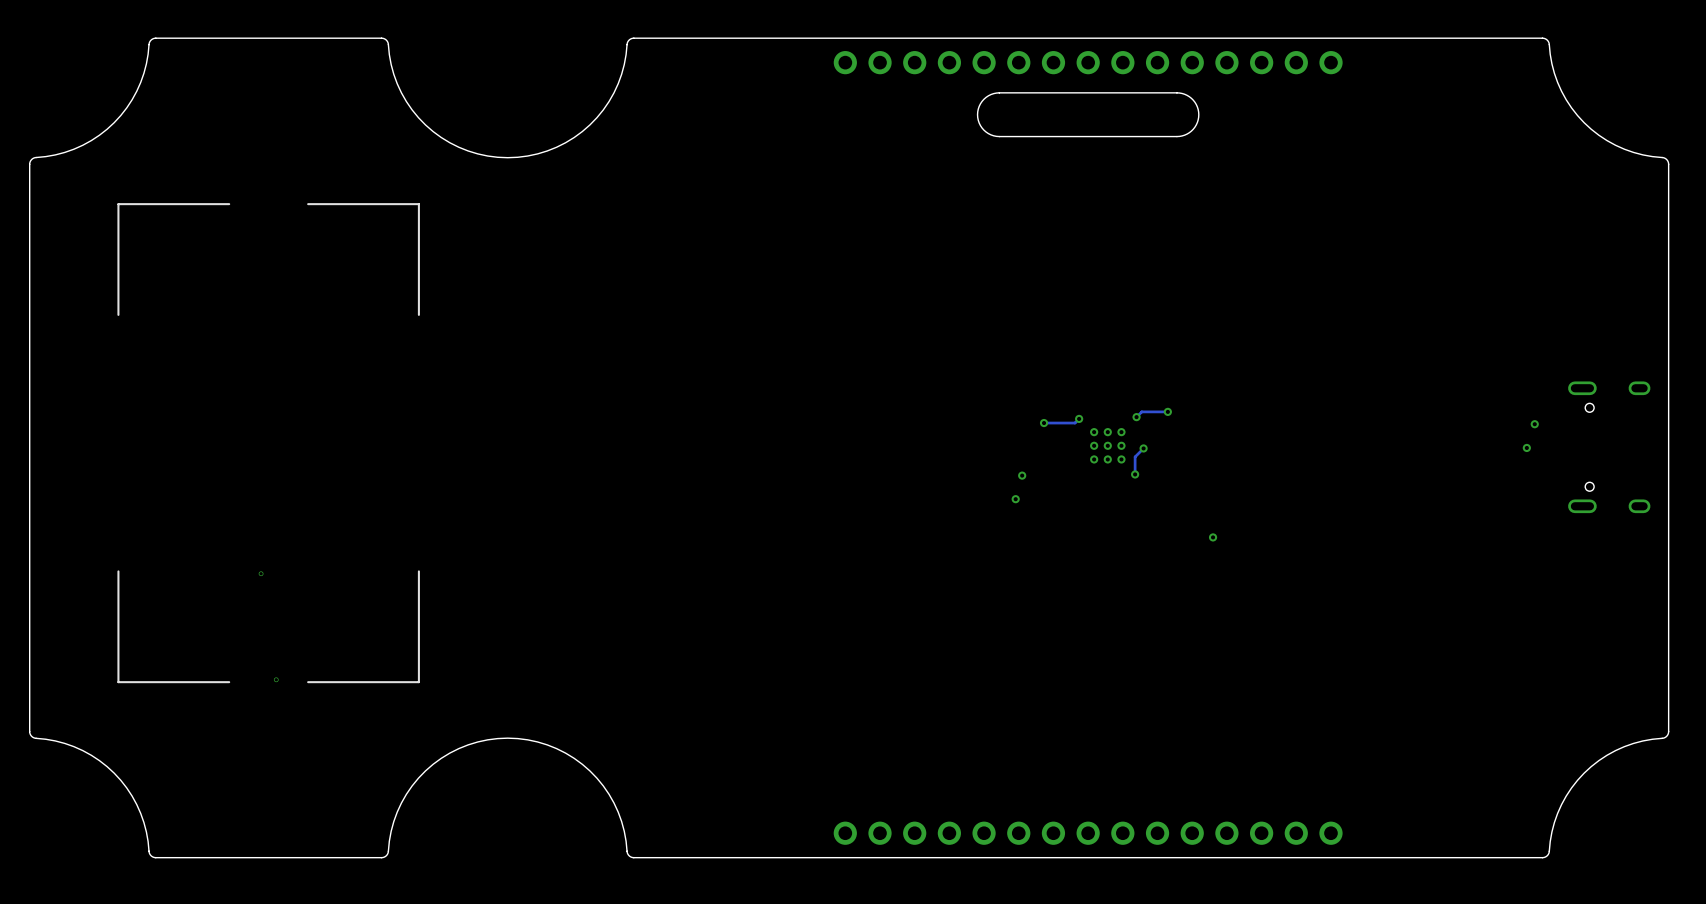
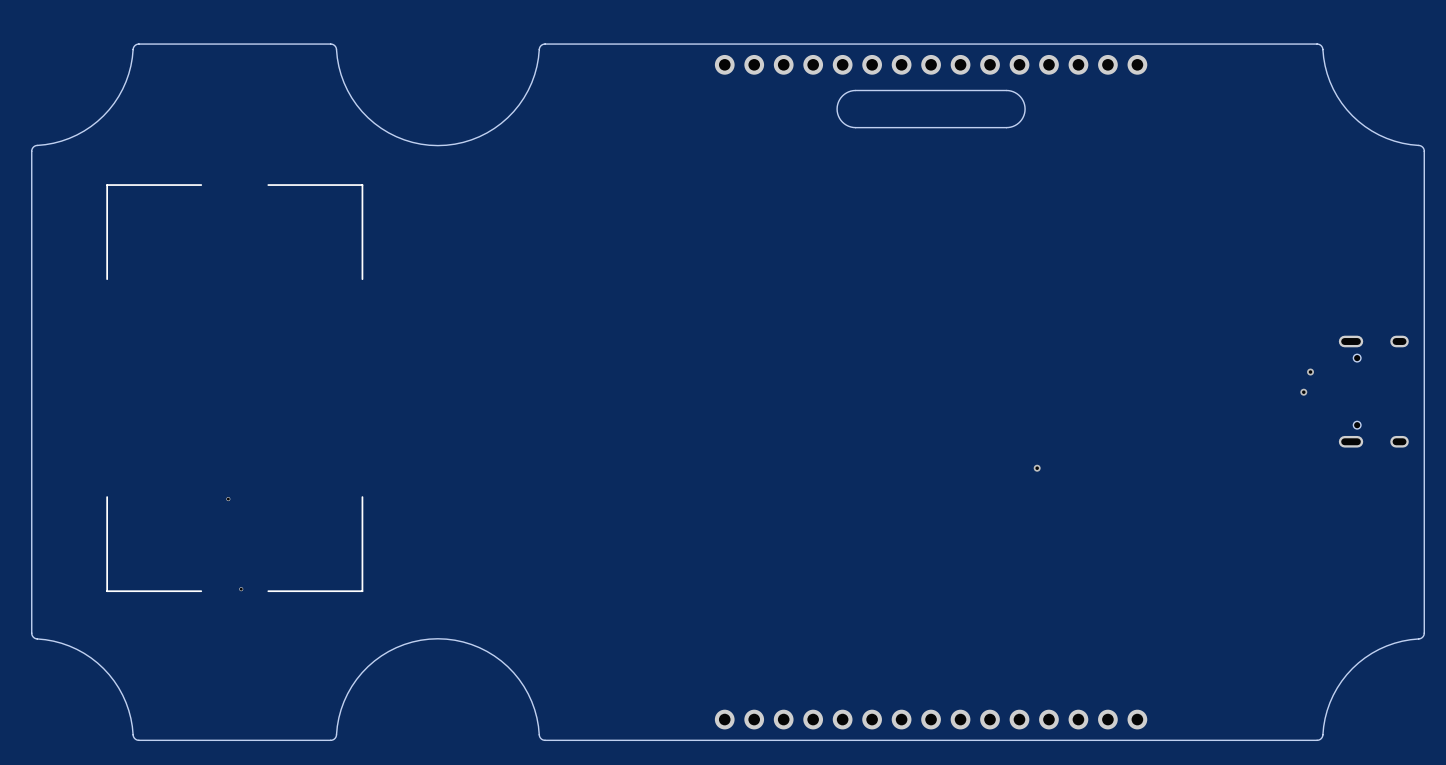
track: (1167, 411) (1141, 411) (1136, 417) -> none
via: (1167, 411) -> none
via: (1136, 417) -> none
track: (1079, 418) (1075, 423) (1044, 423) -> none
via: (1079, 418) -> none
via: (1044, 423) -> none
via: (1094, 432) -> none
via: (1107, 432) -> none
via: (1121, 432) -> none
via: (1094, 445) -> none
via: (1107, 445) -> none
via: (1121, 445) -> none
track: (1143, 448) (1135, 456) (1135, 474) -> none
via: (1143, 448) -> none
via: (1094, 459) -> none
via: (1107, 459) -> none
via: (1121, 459) -> none
via: (1135, 474) -> none
via: (1022, 475) -> none
via: (1015, 499) -> none

